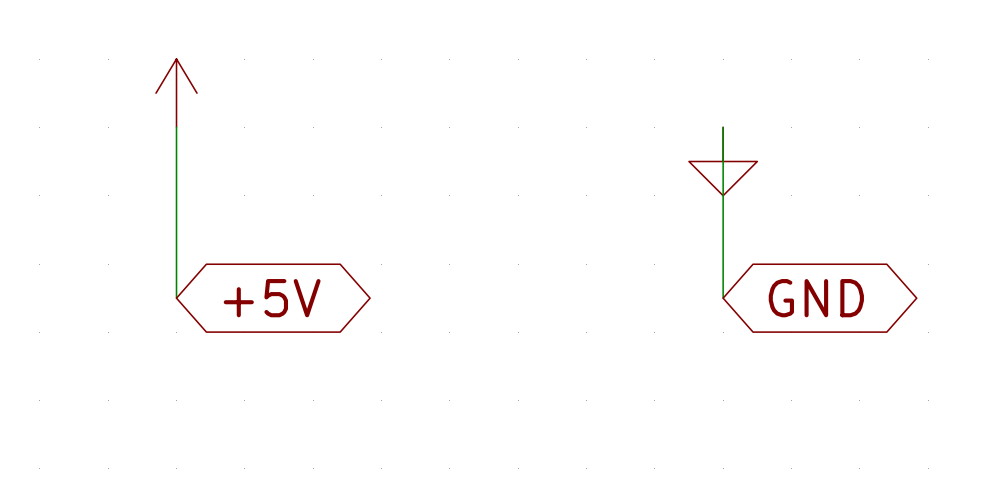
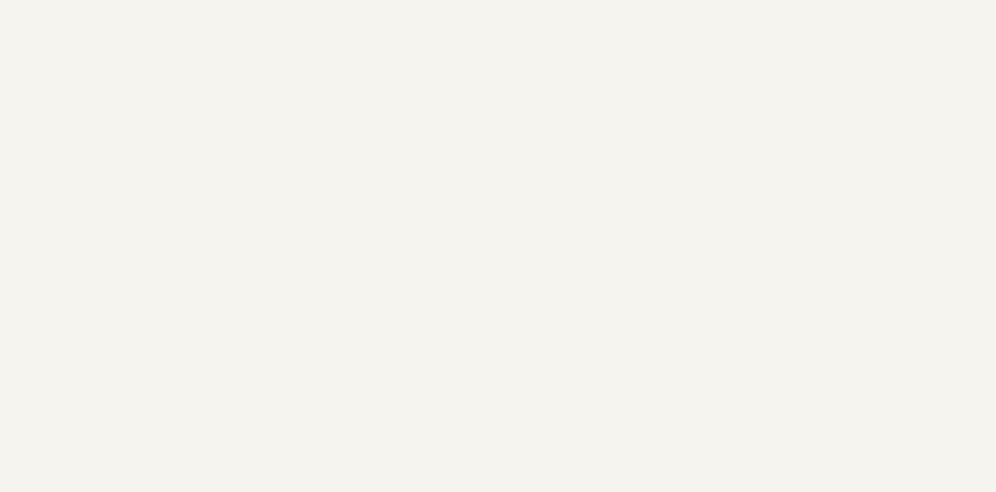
power symbol: (176, 93) -> none
wire: (176, 127) (176, 298) -> none
wire: (723, 127) (723, 298) -> none
power symbol: (723, 161) -> none
global label: +5V (272, 298) -> none
global label: GND (816, 298) -> none

